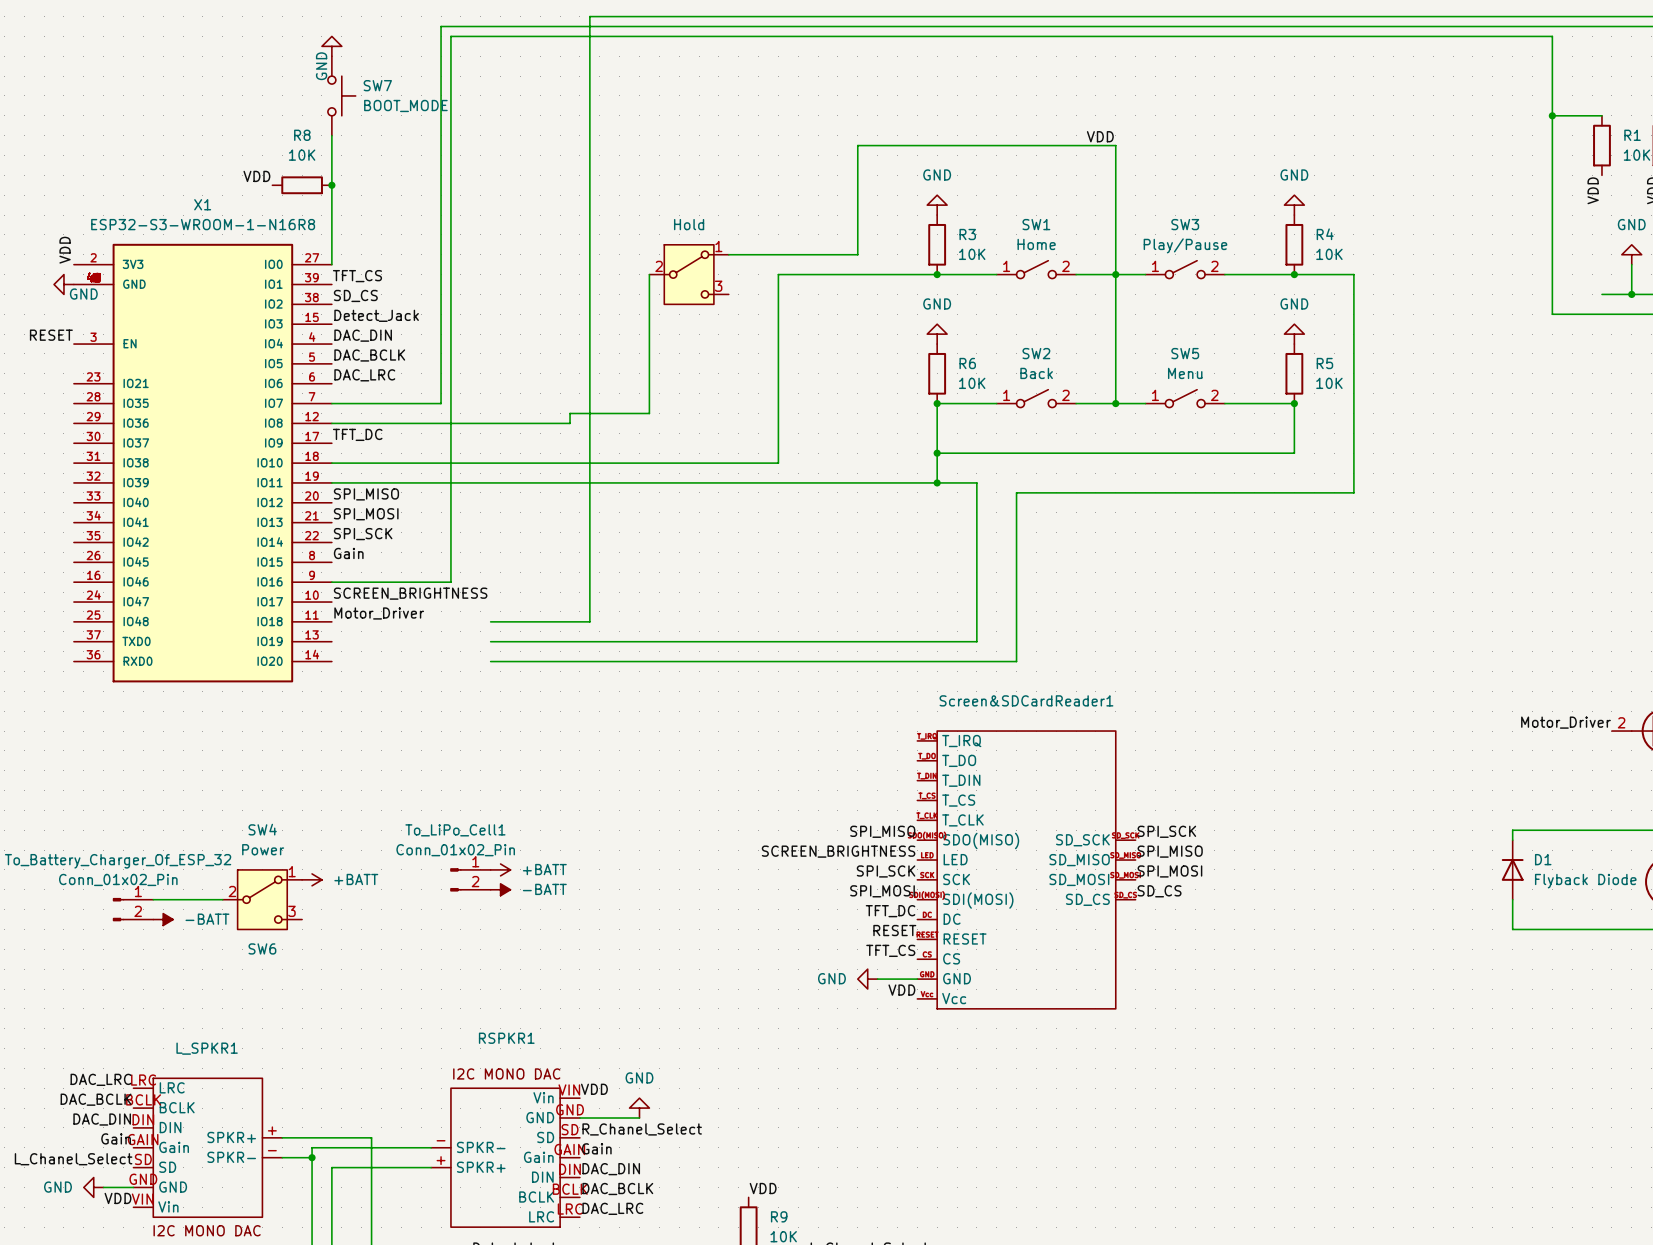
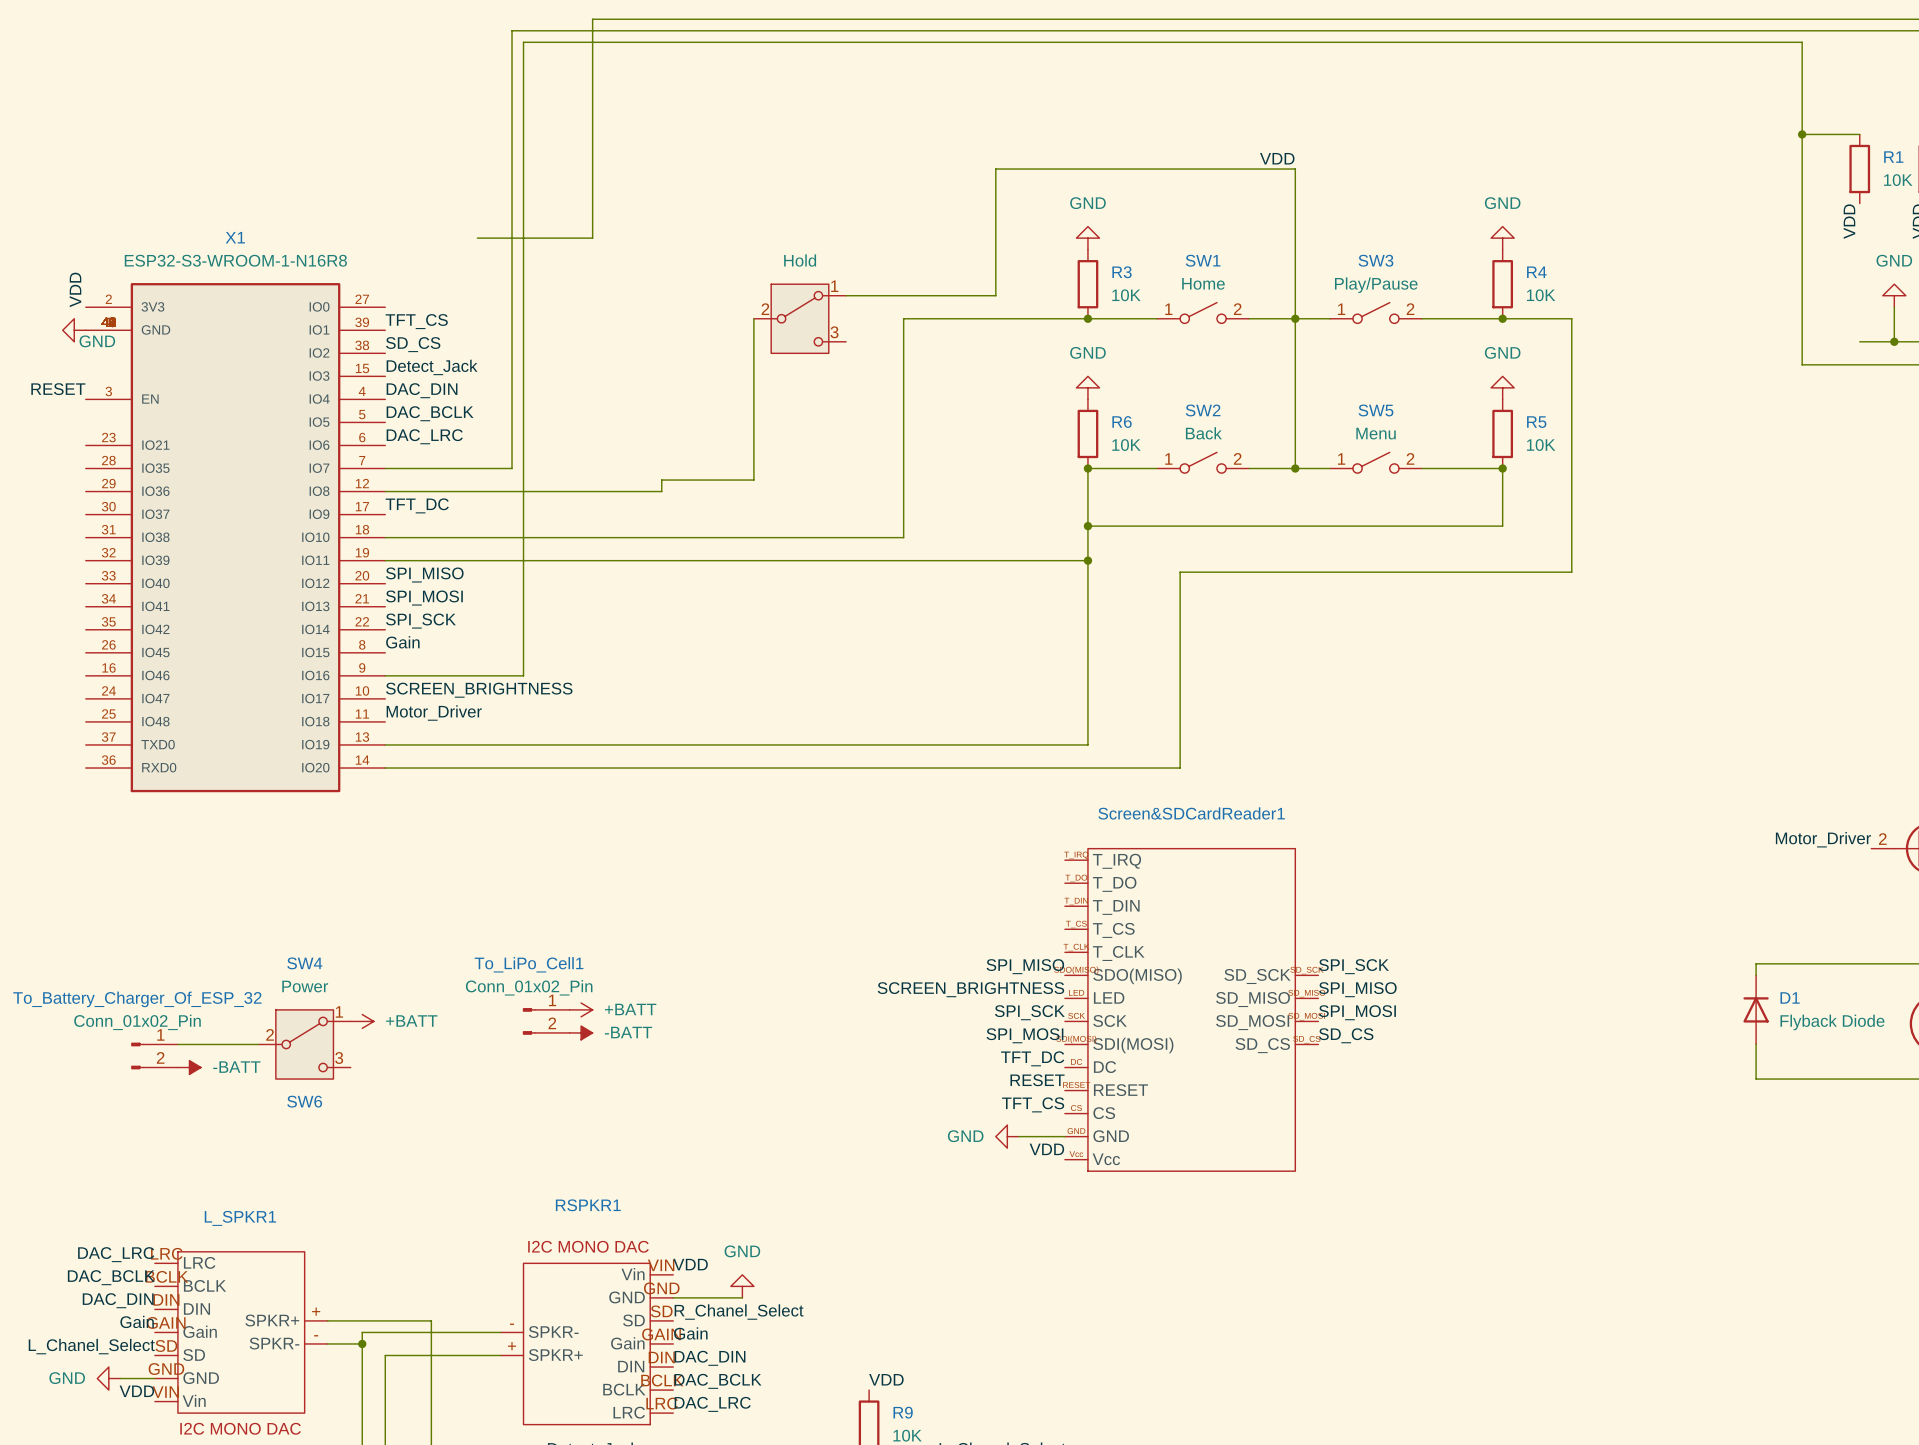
wire: (589, 16) (589, 621) (490, 621) -> (684, 19) (592, 19) (592, 238) (477, 238)
power symbol: GND (331, 46) -> none
SW7: BOOT_MODE (341, 95) -> none
wire: (331, 135) (331, 264) -> none
label: VDD (256, 176) -> none
R8: 10K (302, 185) -> none
junction: (331, 185) -> none
wire: (937, 482) (976, 482) (976, 641) (937, 641) -> (1087, 560) (1087, 744)
wire: none -> (385, 744) (569, 744)
wire: none -> (385, 768) (569, 768)

